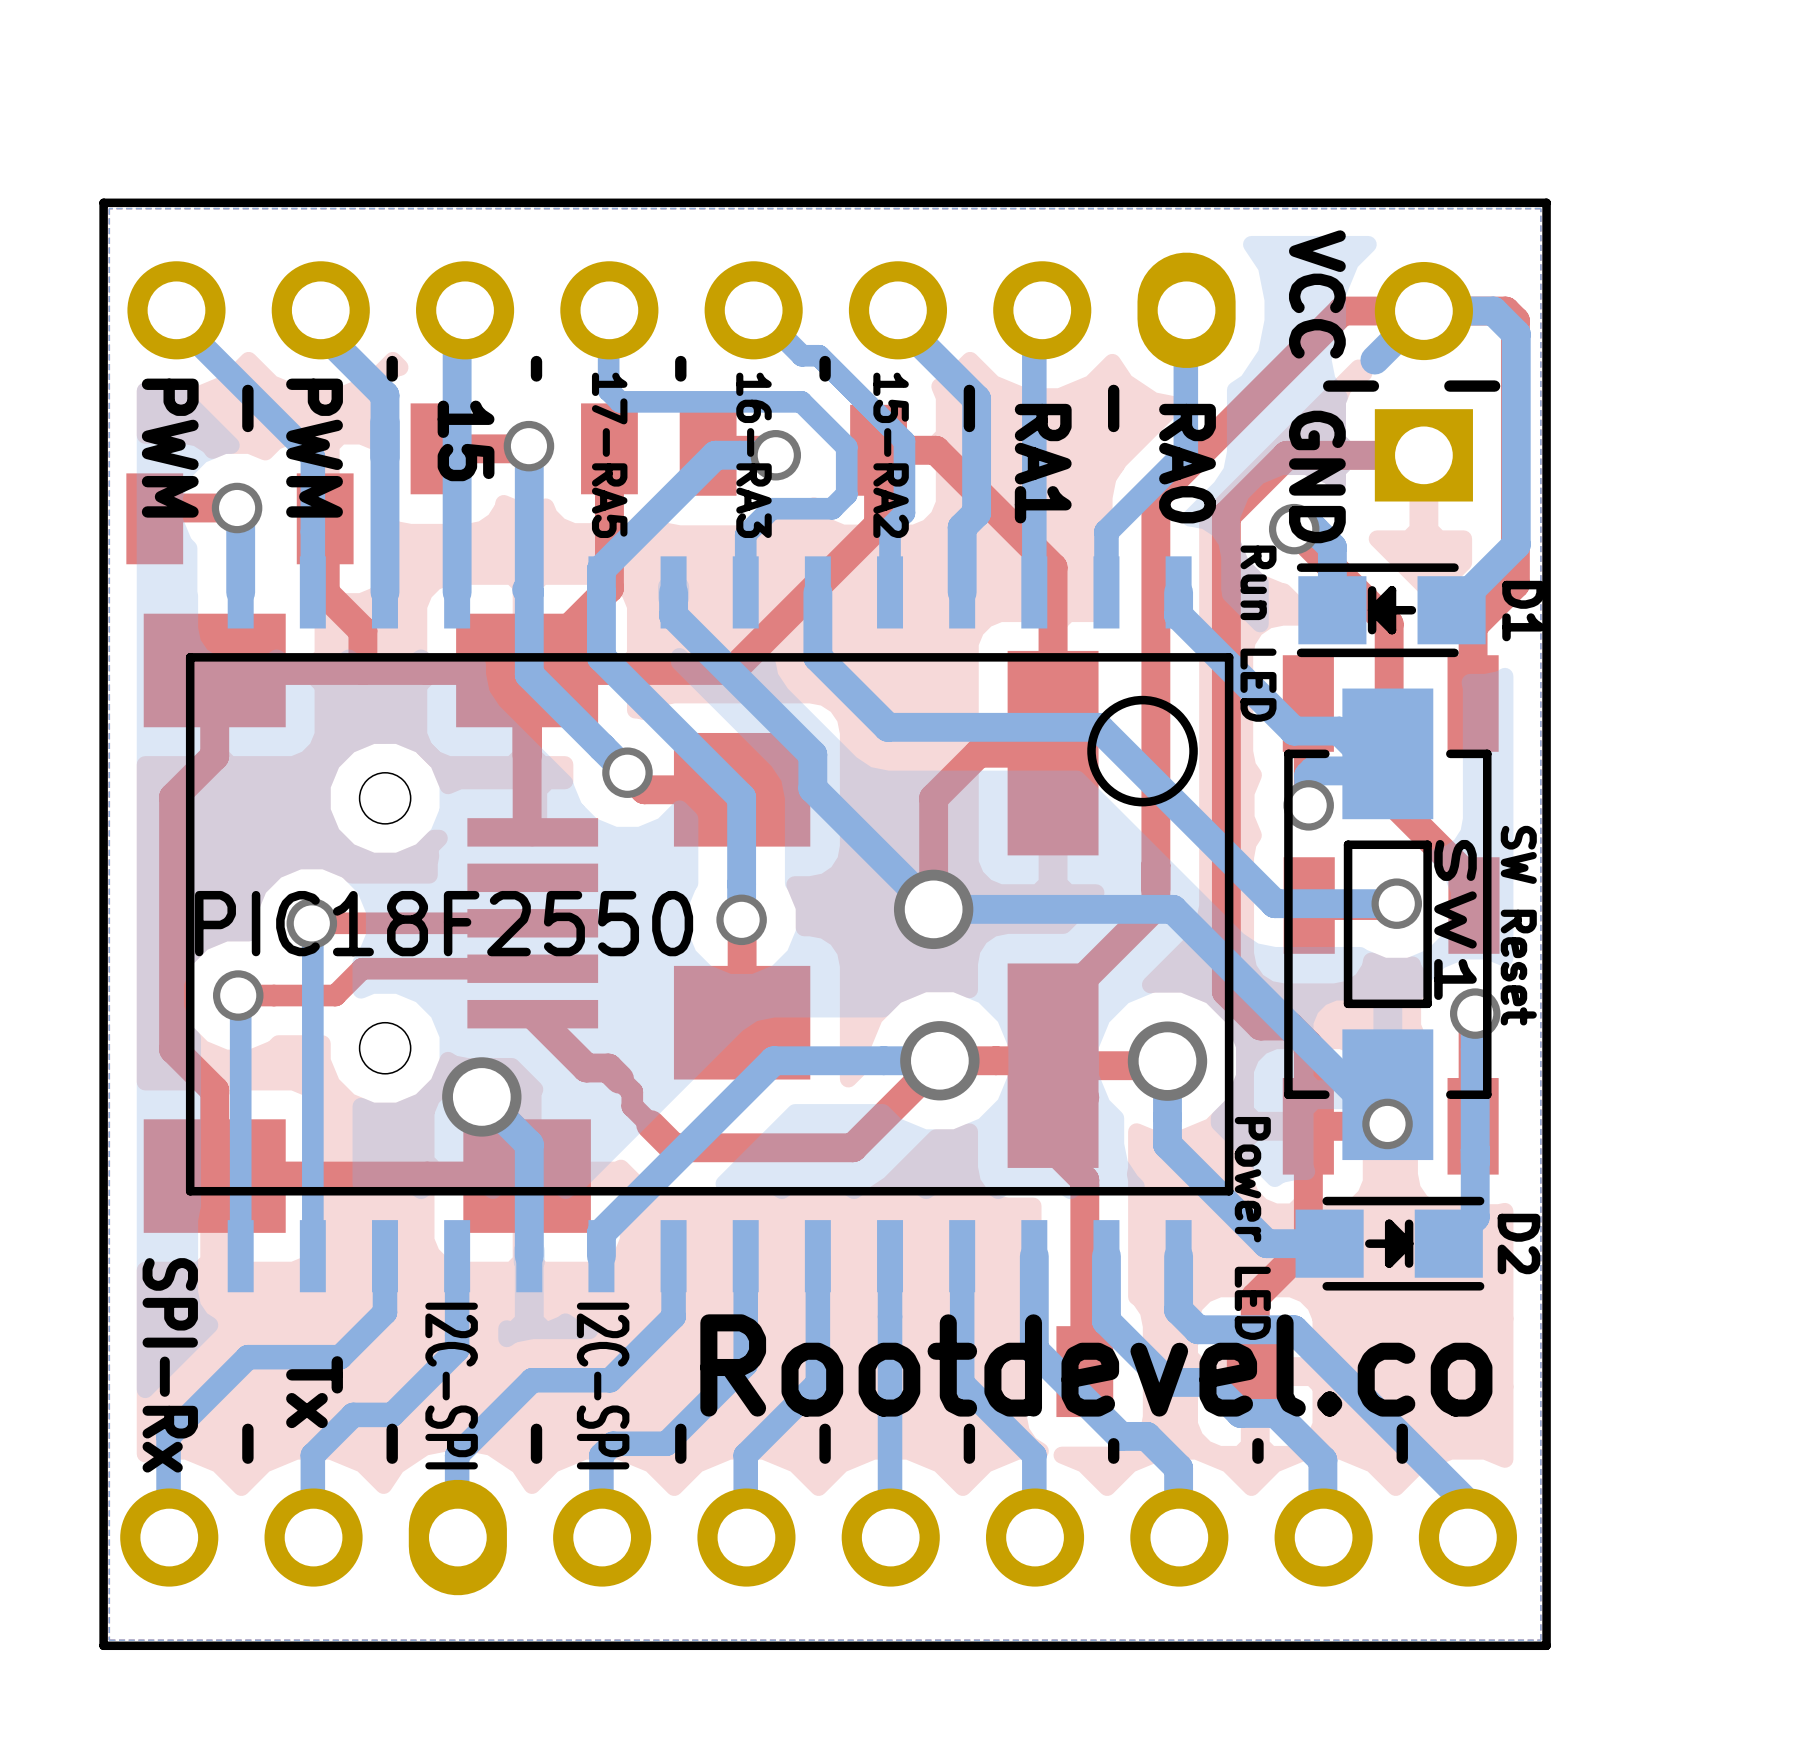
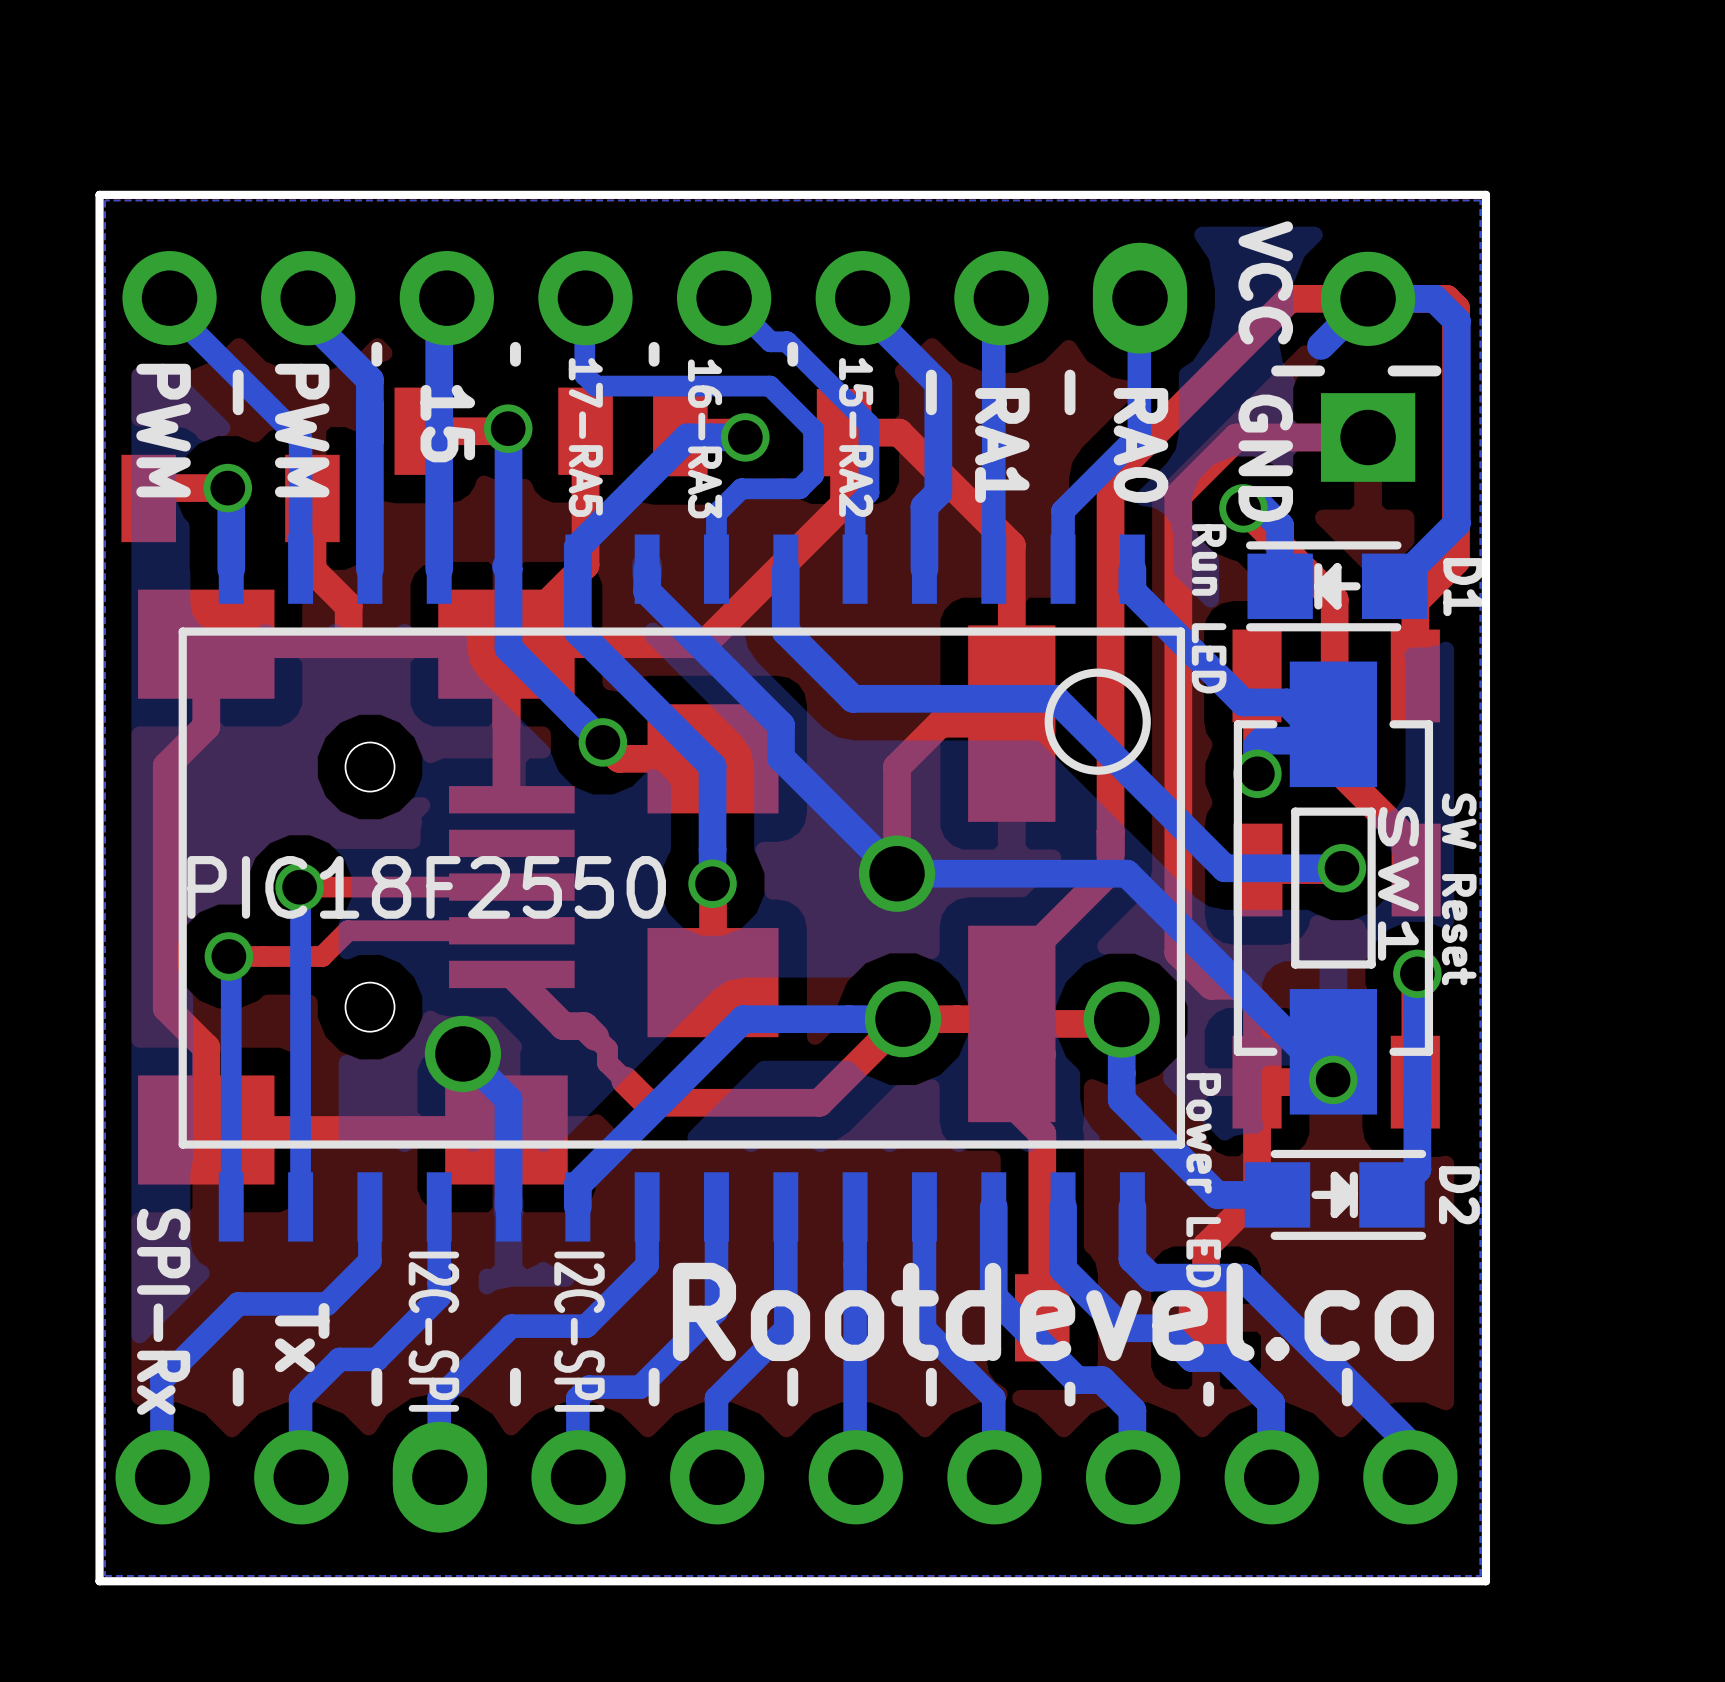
text position: 16-RA3 (754, 455) -> 16-RA3 (705, 438)

